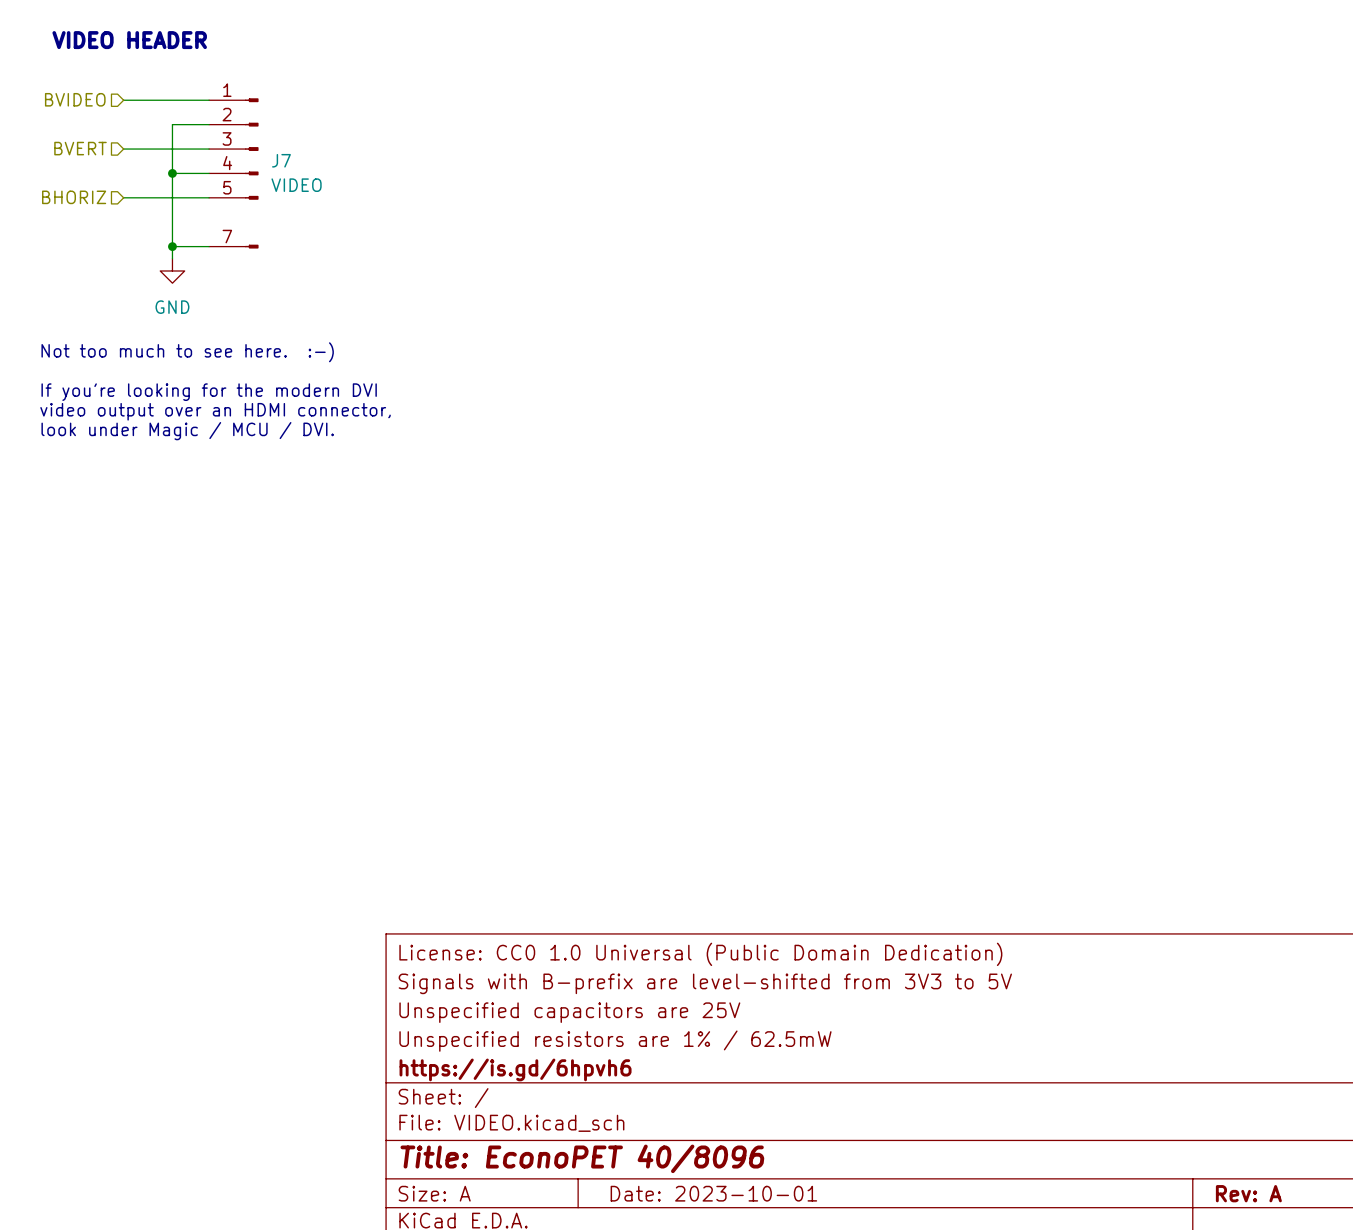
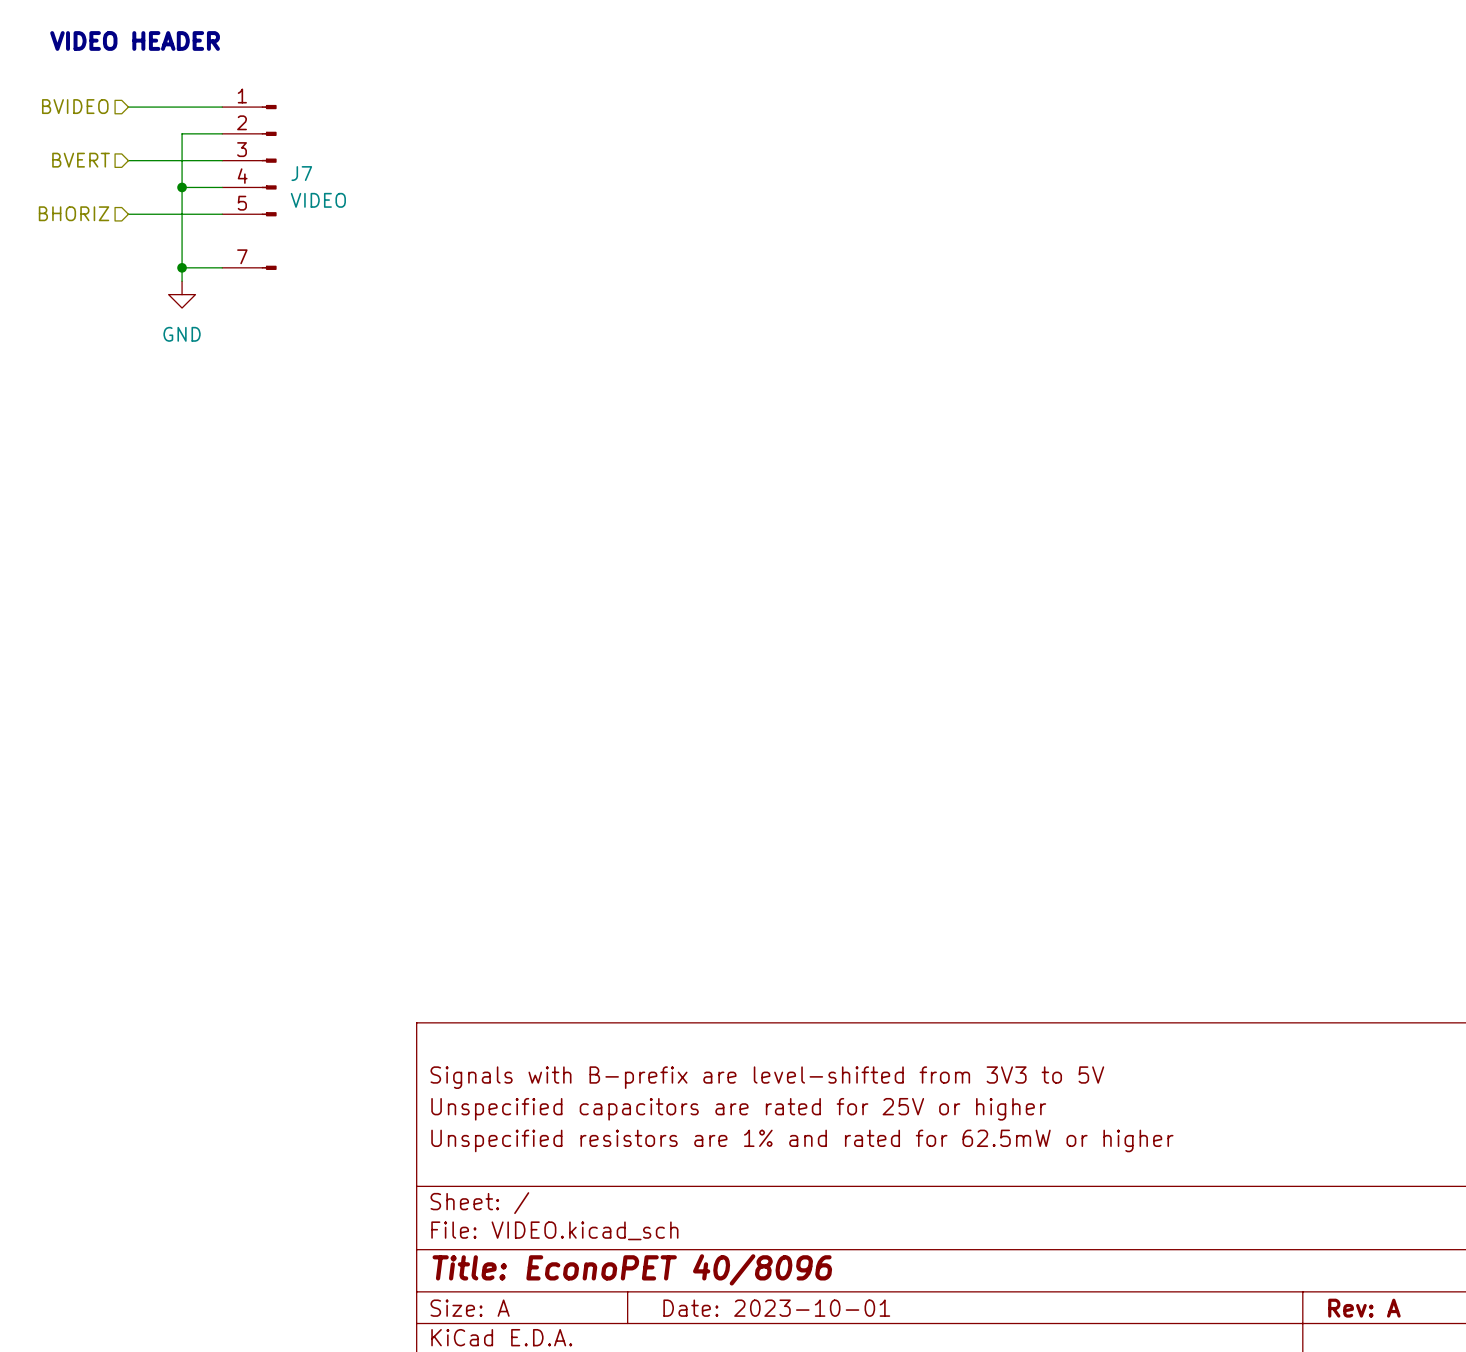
text: Not too much to see here. :-) (187, 352) -> none
text: If you're looking for the modern DVI (209, 392) -> none
text: video output over an HDMI connector, (215, 411) -> none
text: look under Magic / MCU / DVI. (187, 431) -> none
title block: License: CC0 1.0 Universal (Public Domain Dedication) (700, 954) -> none
title block: Unspecified capacitors are 25V (569, 1012) -> Unspecified capacitors are rated for 25V or higher (738, 1109)
title block: Unspecified resistors are 1% / 62.5mW (615, 1041) -> Unspecified resistors are 1% and rated for 62.5mW or higher (802, 1140)
title block: https://is.gd/6hpvh6 (515, 1069) -> none

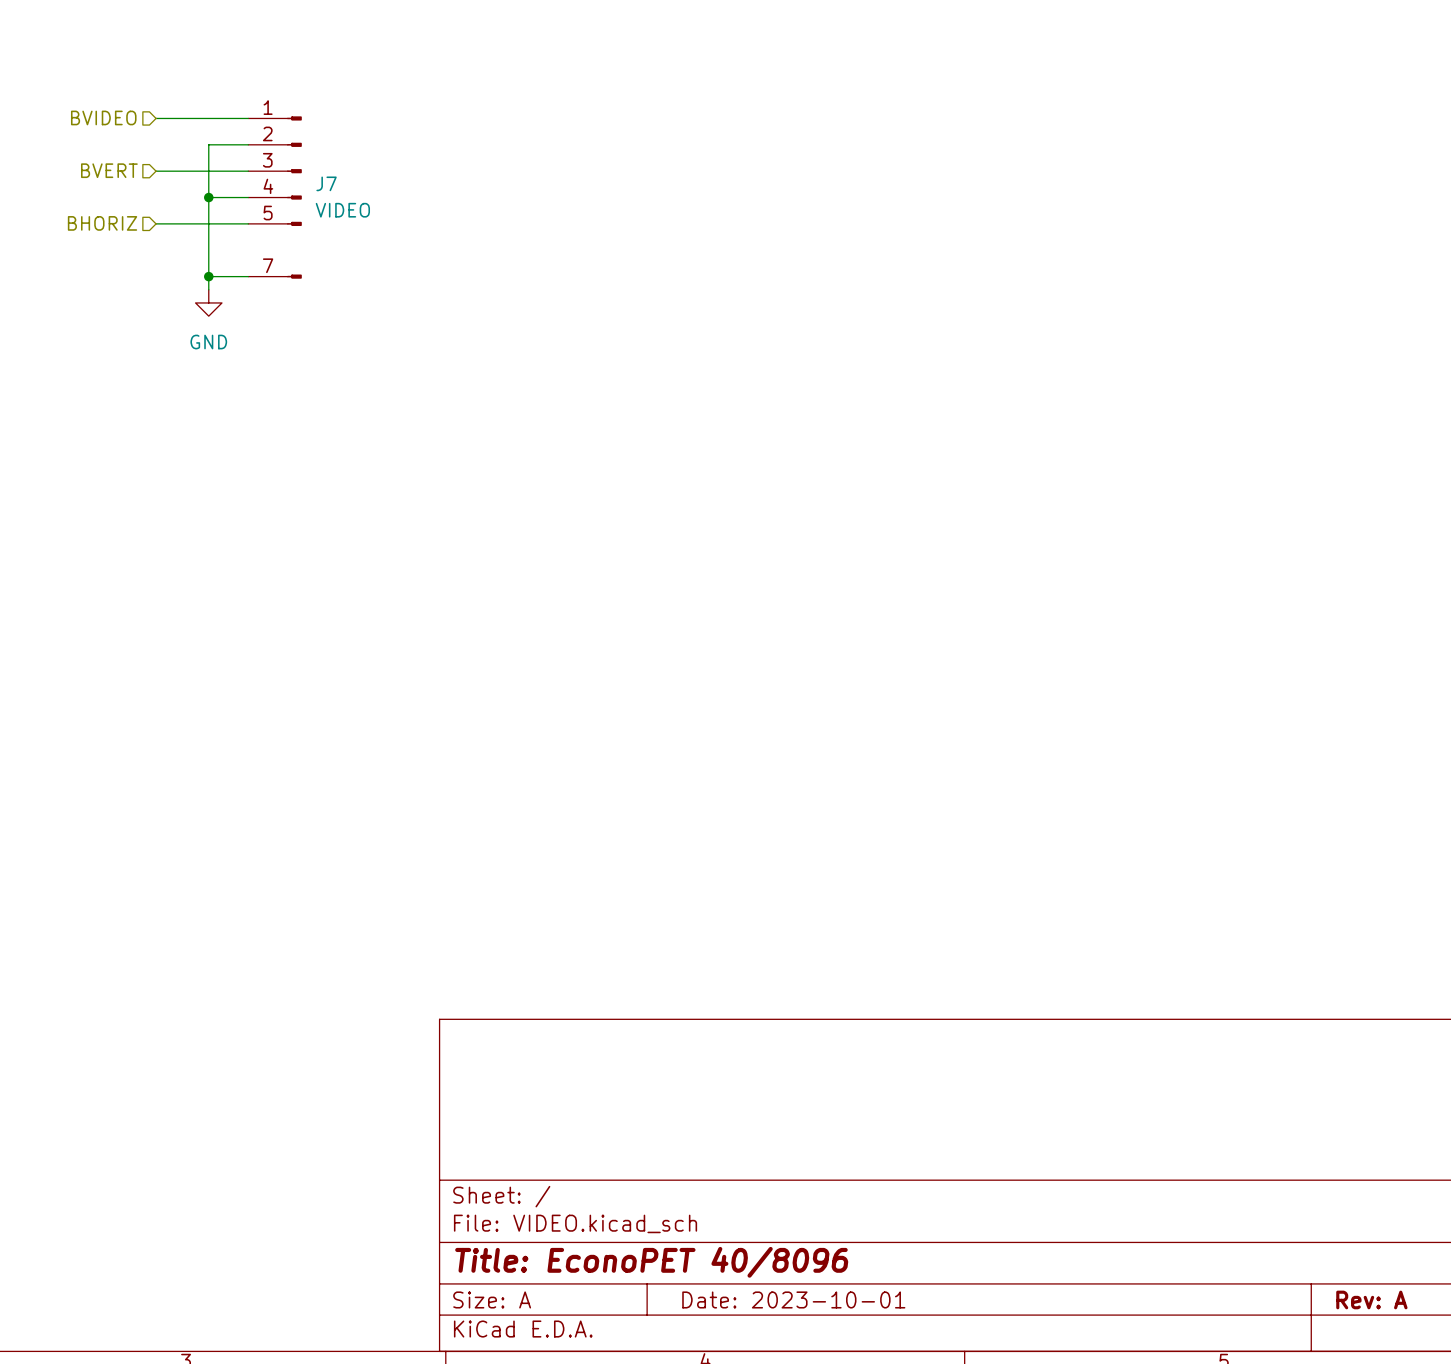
text: VIDEO HEADER (135, 40) -> none
title block: Signals with B-prefix are level-shifted from 3V3 to 5V (767, 1077) -> none
title block: Unspecified capacitors are rated for 25V or higher (738, 1109) -> none
title block: Unspecified resistors are 1% and rated for 62.5mW or higher (802, 1140) -> none

